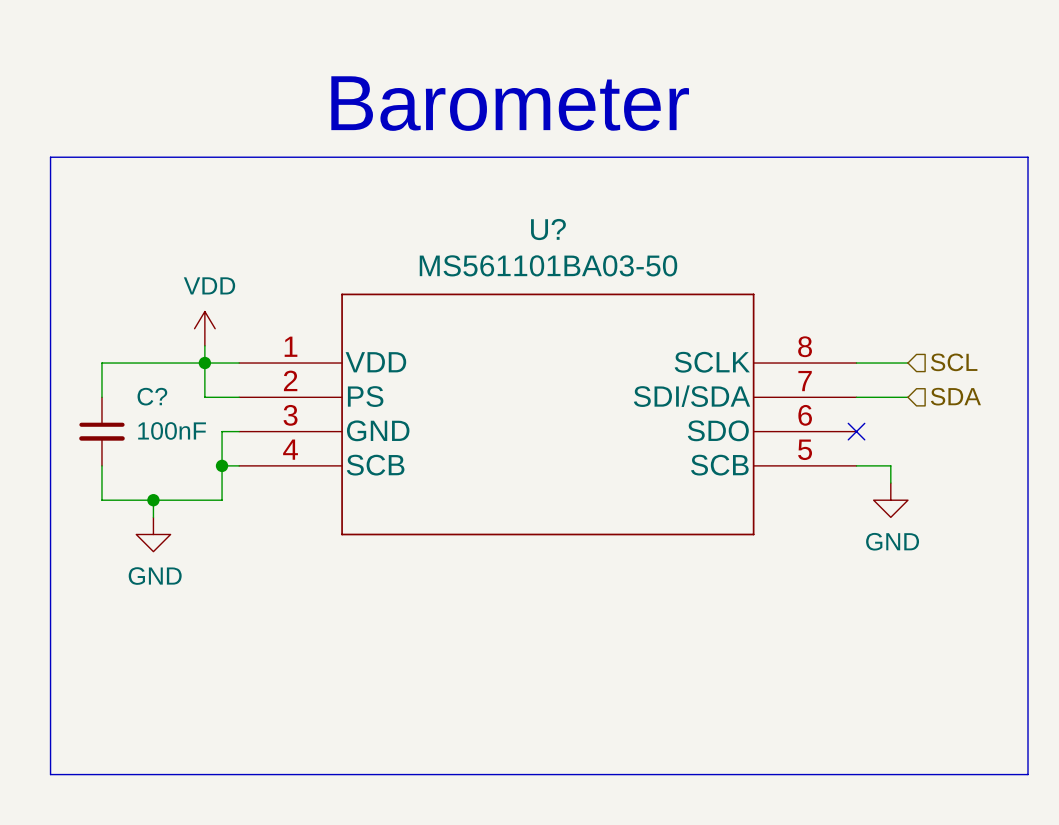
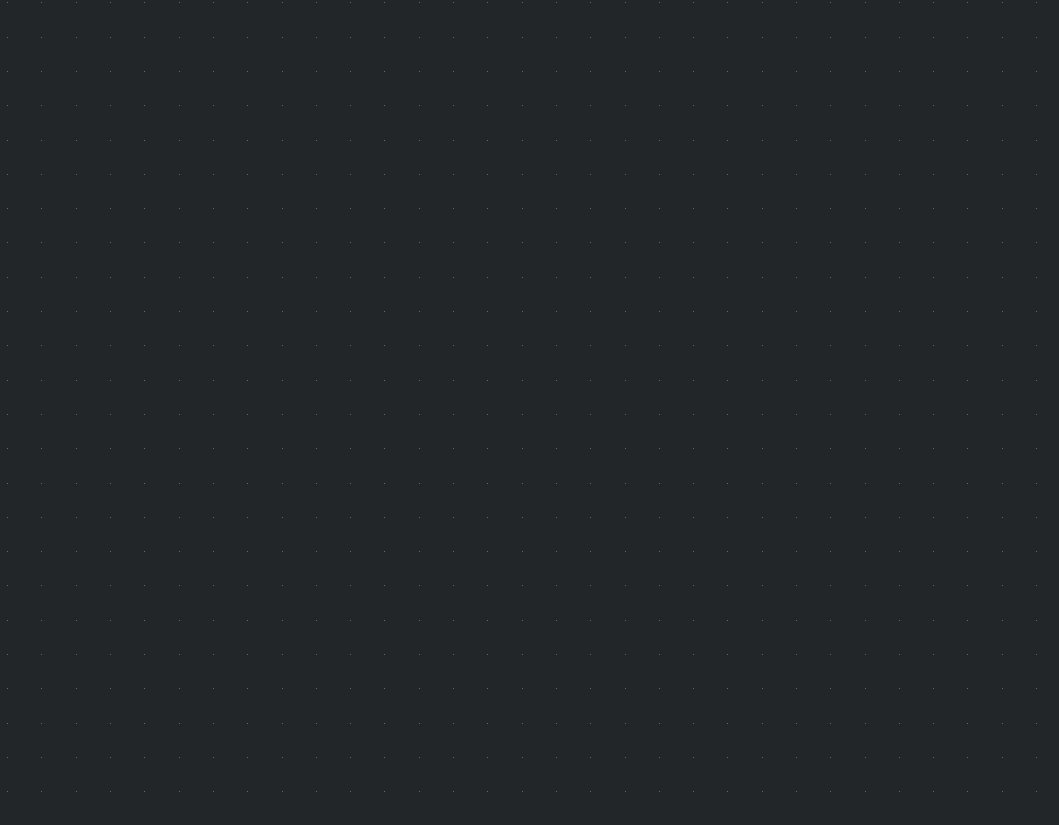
text: Barometer (510, 103) -> none
line: (50, 157) (1028, 157) (1028, 774) (50, 774) (50, 157) -> none
power symbol: VDD (204, 328) -> none
wire: (204, 345) (204, 397) (239, 397) -> none
hierarchical label: SCL (954, 362) -> none
junction: (204, 363) -> none
wire: (239, 363) (101, 363) (101, 397) -> none
wire: (856, 363) (907, 363) -> none
hierarchical label: SDA (955, 396) -> none
wire: (856, 397) (907, 397) -> none
U?: MS561101BA03-50 (547, 414) -> none
C?: 100nF (101, 431) -> none
wire: (239, 431) (222, 431) (222, 500) (101, 500) (101, 465) -> none
no-connect mark: (856, 431) -> none
wire: (222, 465) (239, 465) -> none
junction: (222, 465) -> none
wire: (856, 465) (890, 465) (890, 483) -> none
wire: (153, 500) (153, 517) -> none
junction: (153, 500) -> none
power symbol: GND (890, 500) -> none
power symbol: GND (153, 534) -> none

